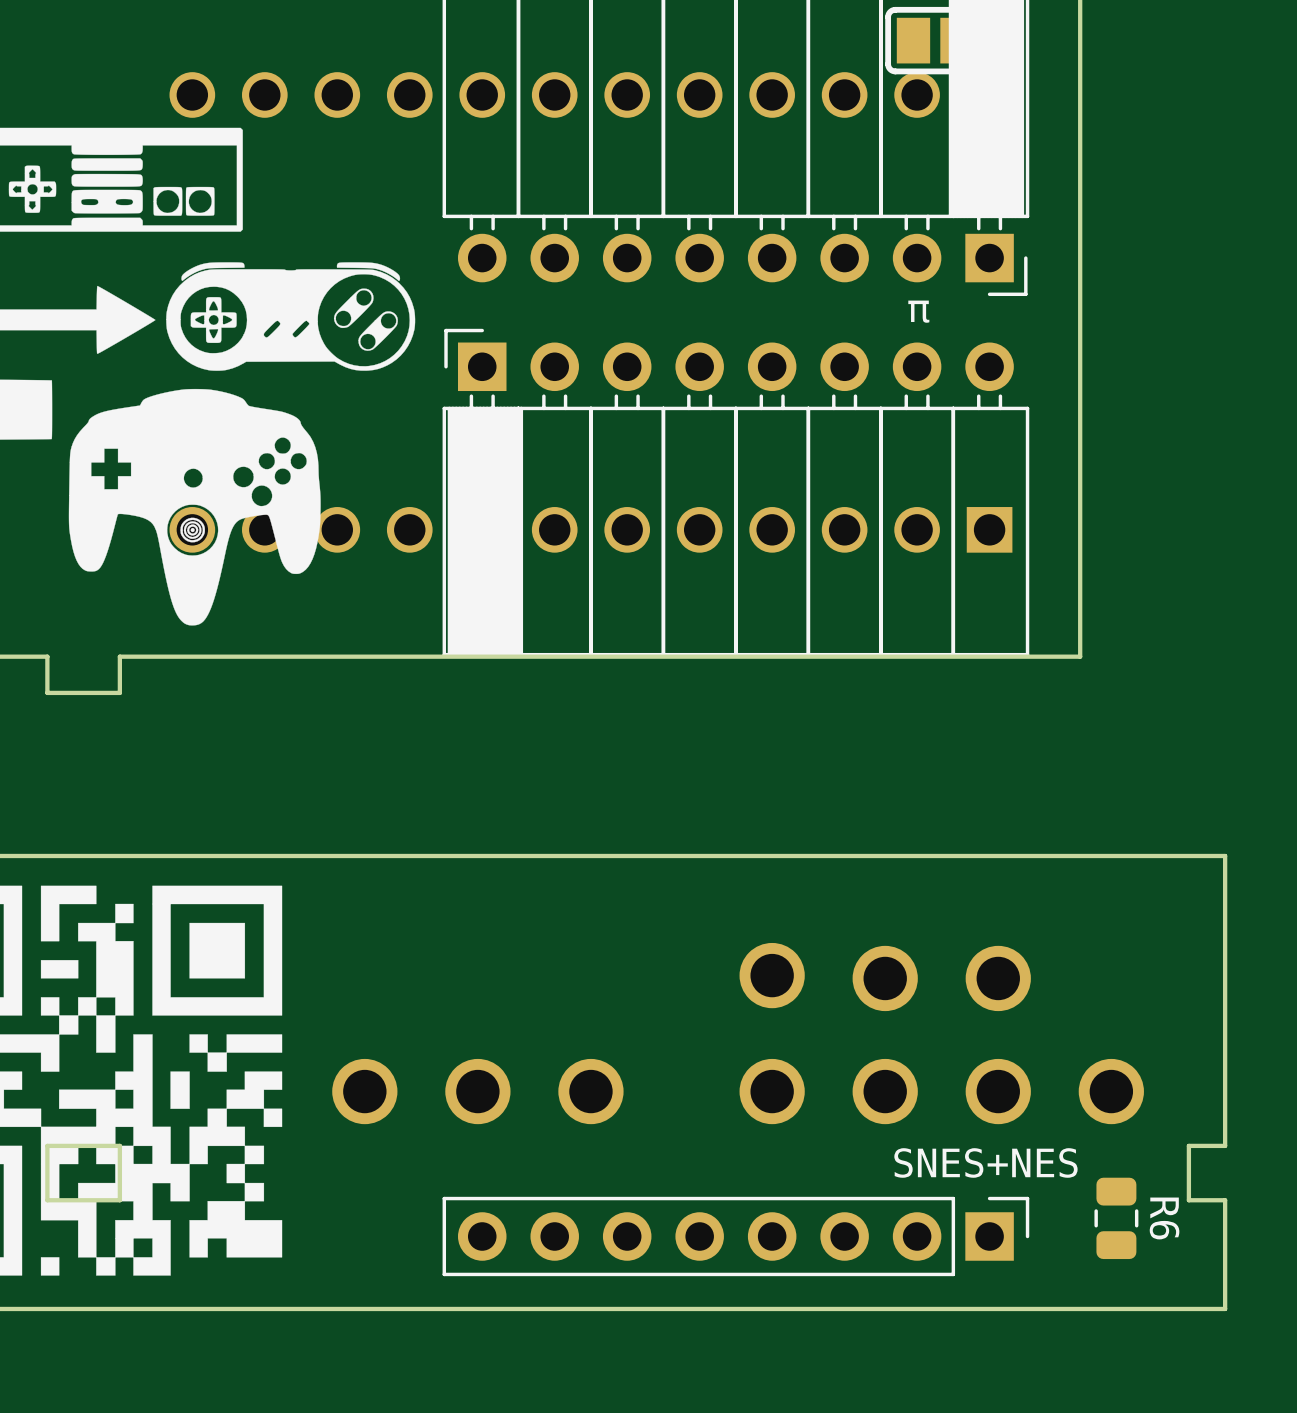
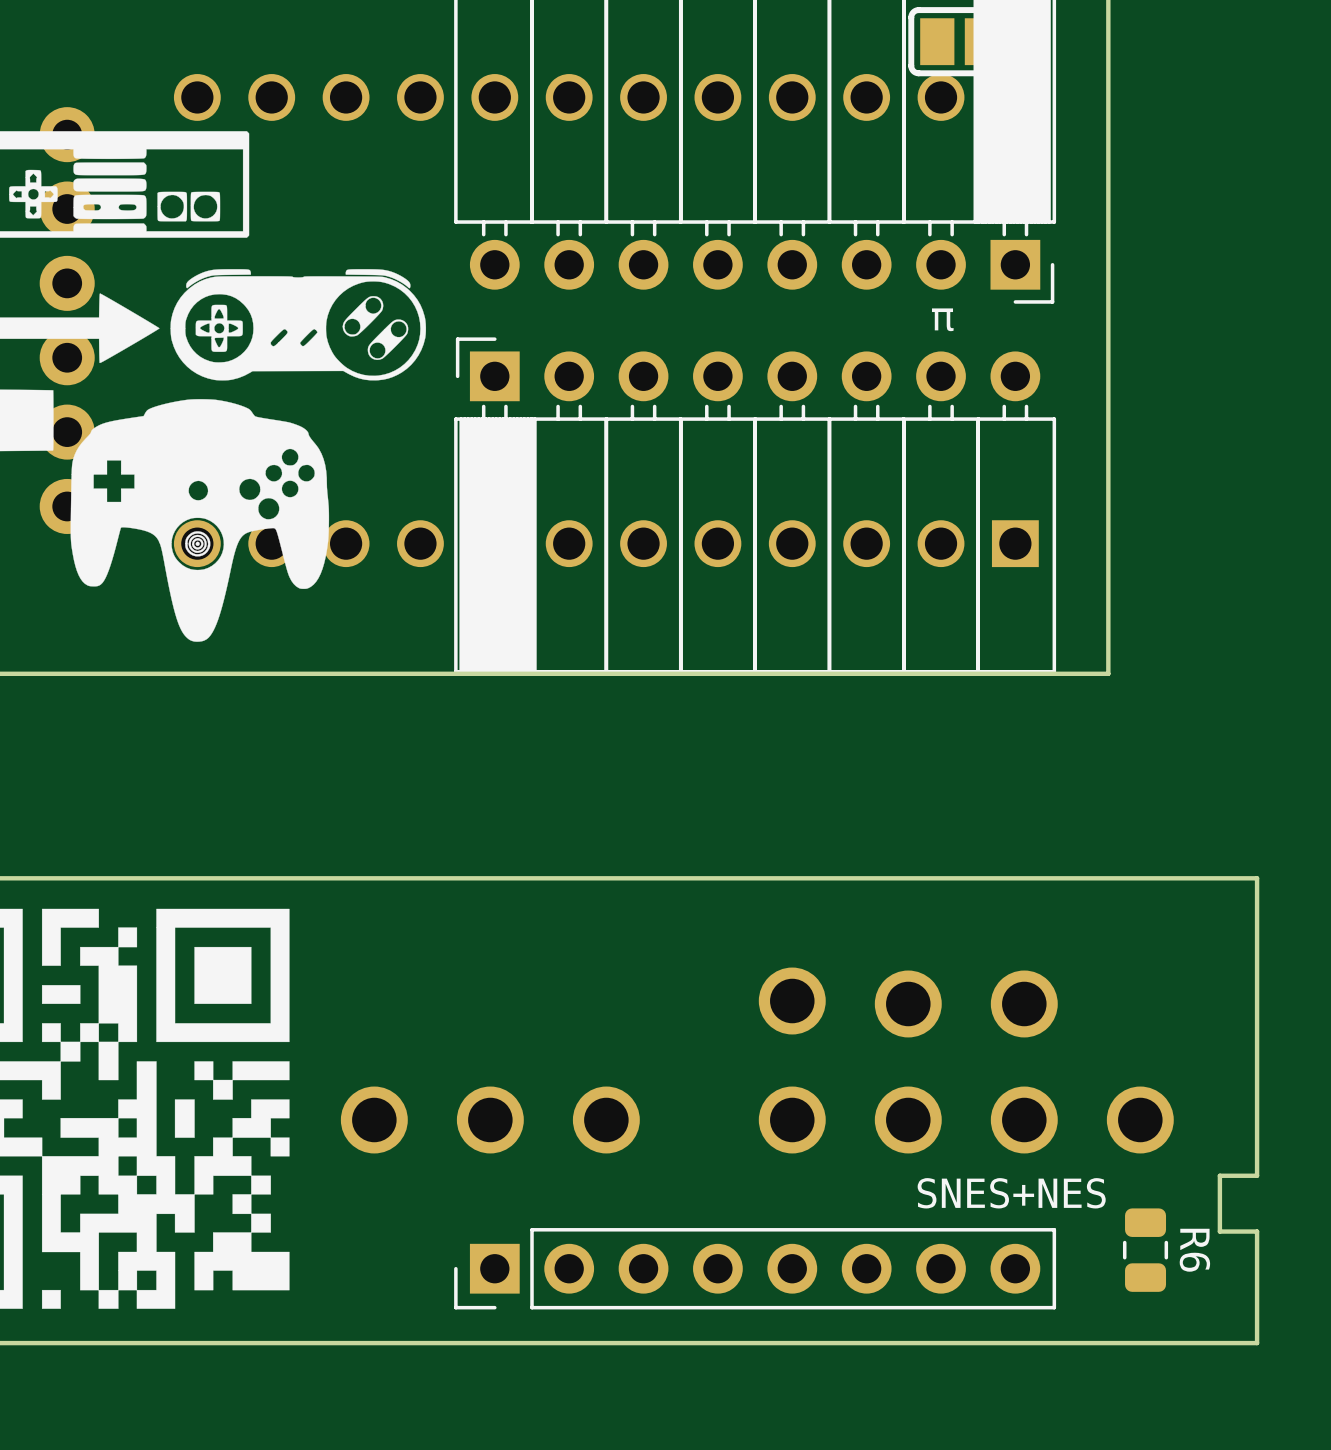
part: none -> (67, 320)
board edge: (119, 656) (119, 692) (47, 692) (47, 656) -> (122, 673) (48, 673)
board edge: (119, 1145) (119, 1200) (47, 1200) (47, 1145) (119, 1145) -> none
part rotation: 0° (735, 1236) -> 180° (755, 1268)

